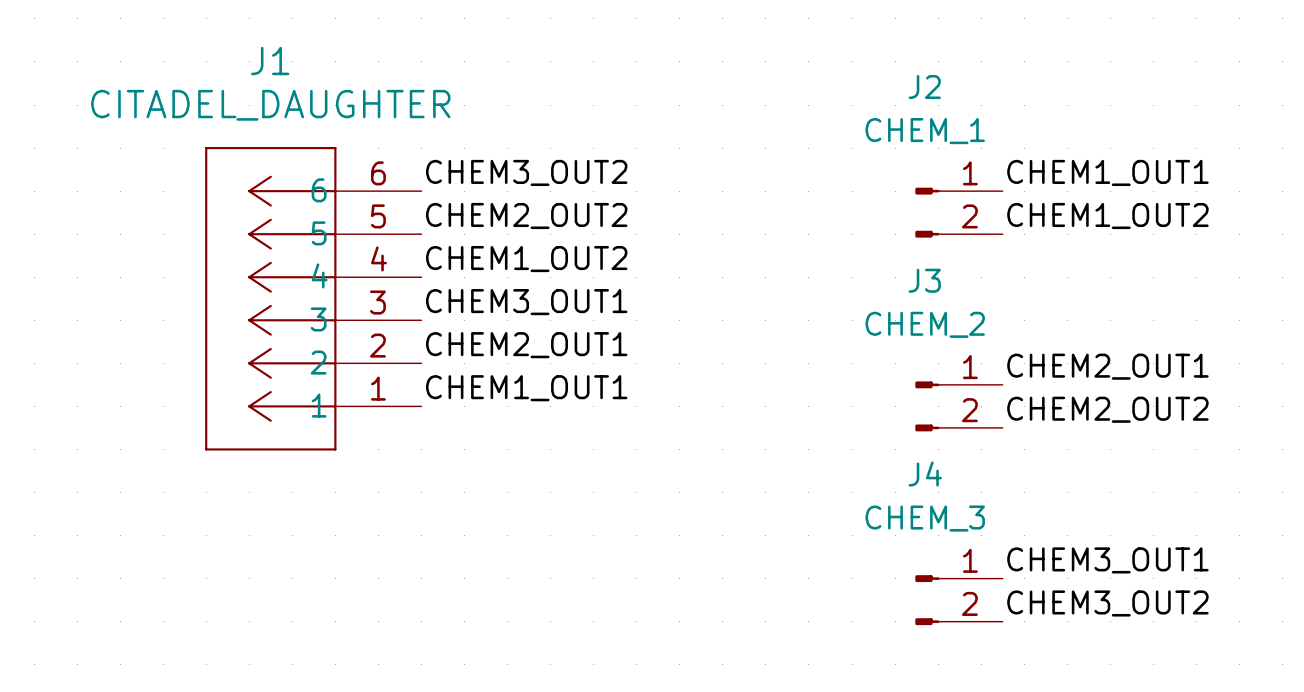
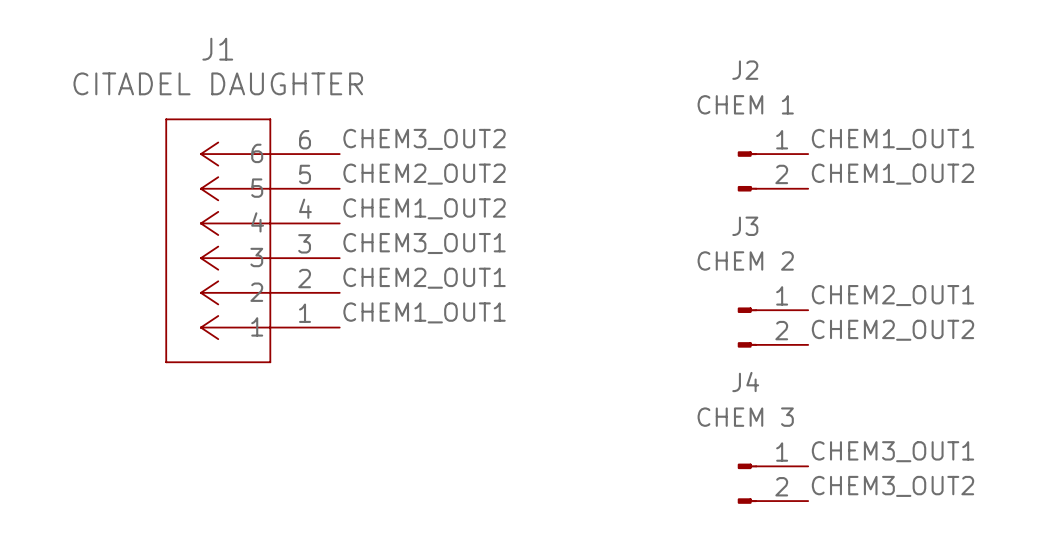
J1 value: CITADEL_DAUGHTER (270, 105) -> CITADEL DAUGHTER (218, 83)
J2 value: CHEM_1 (925, 131) -> CHEM 1 (745, 104)
J3 value: CHEM_2 (925, 324) -> CHEM 2 (745, 260)
J4 value: CHEM_3 (925, 518) -> CHEM 3 (745, 417)

